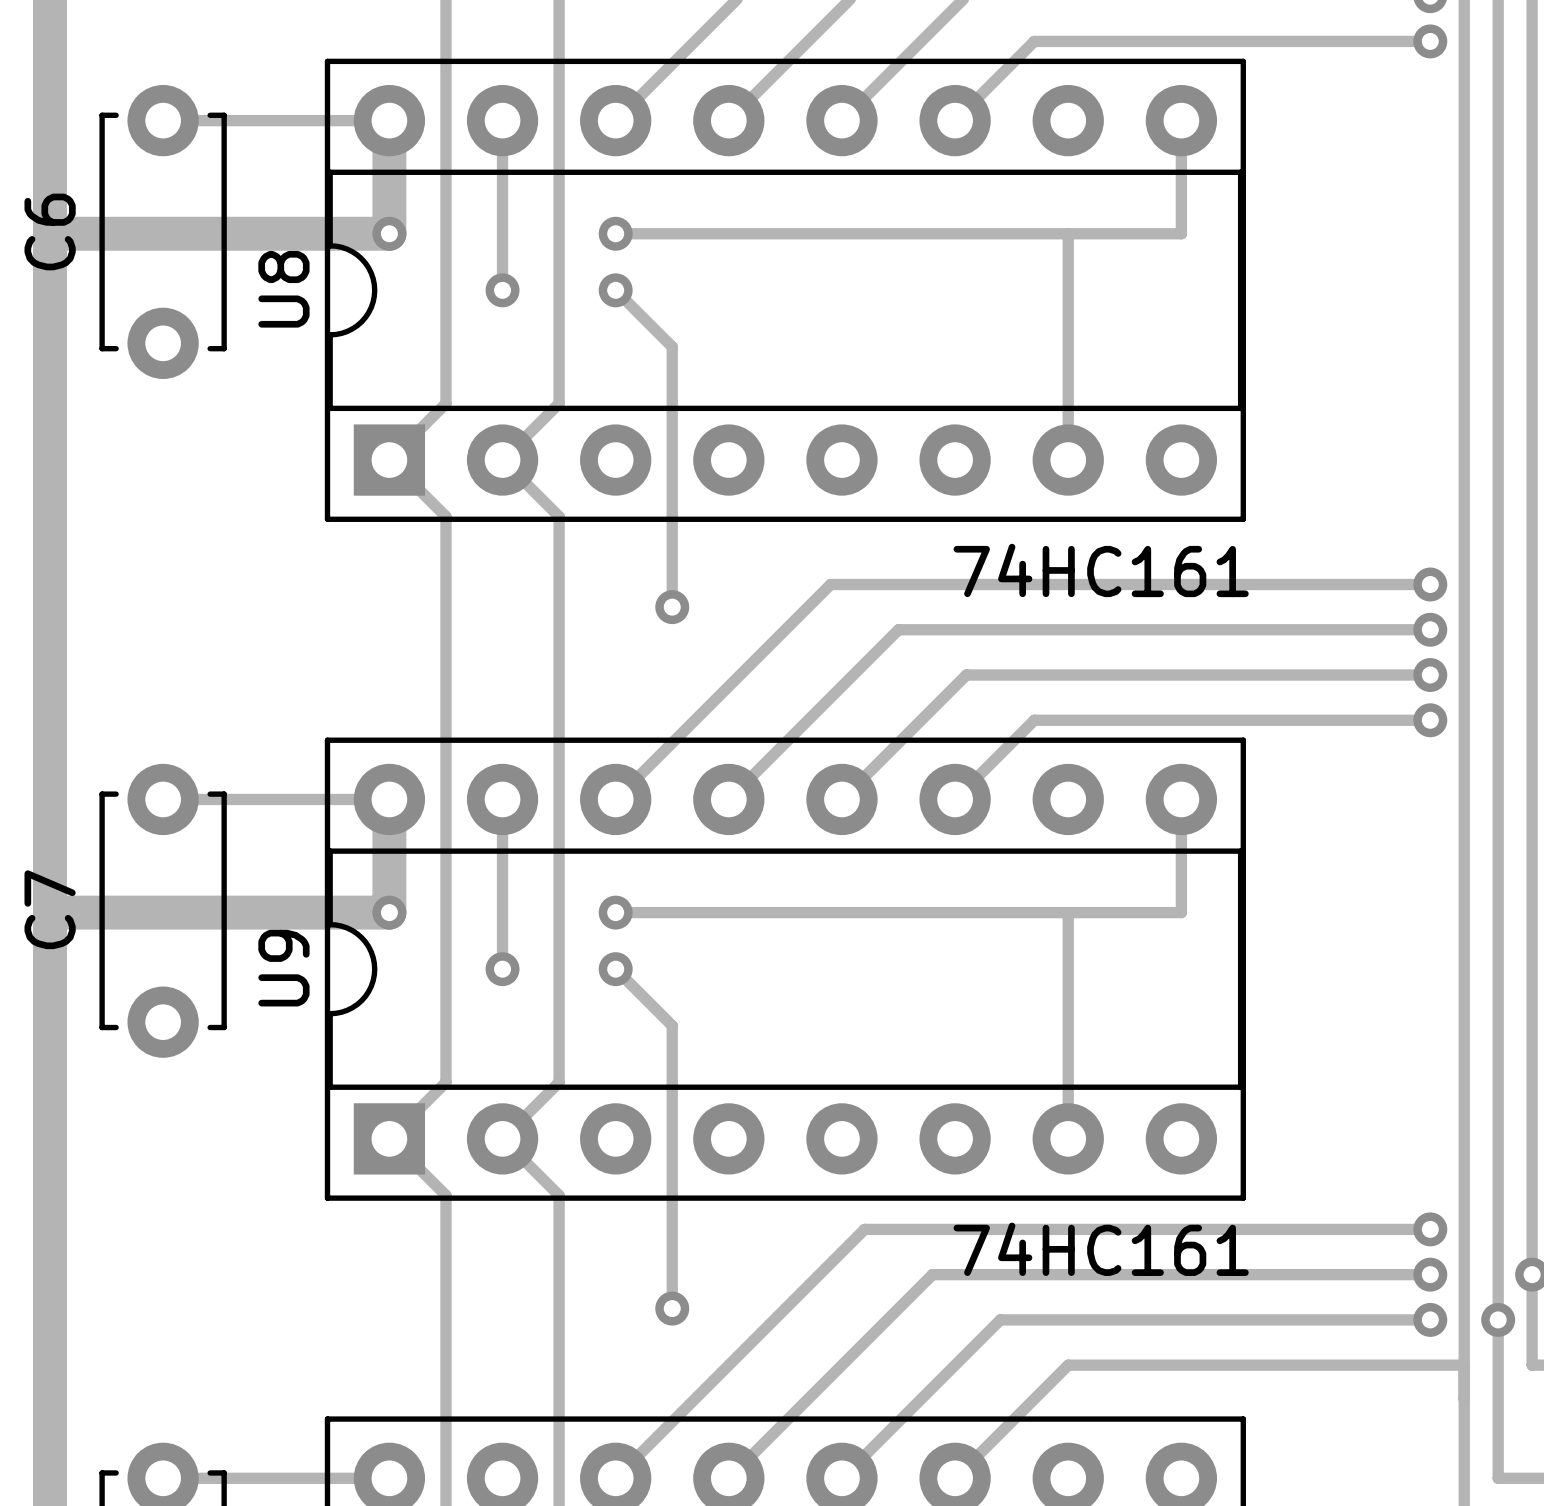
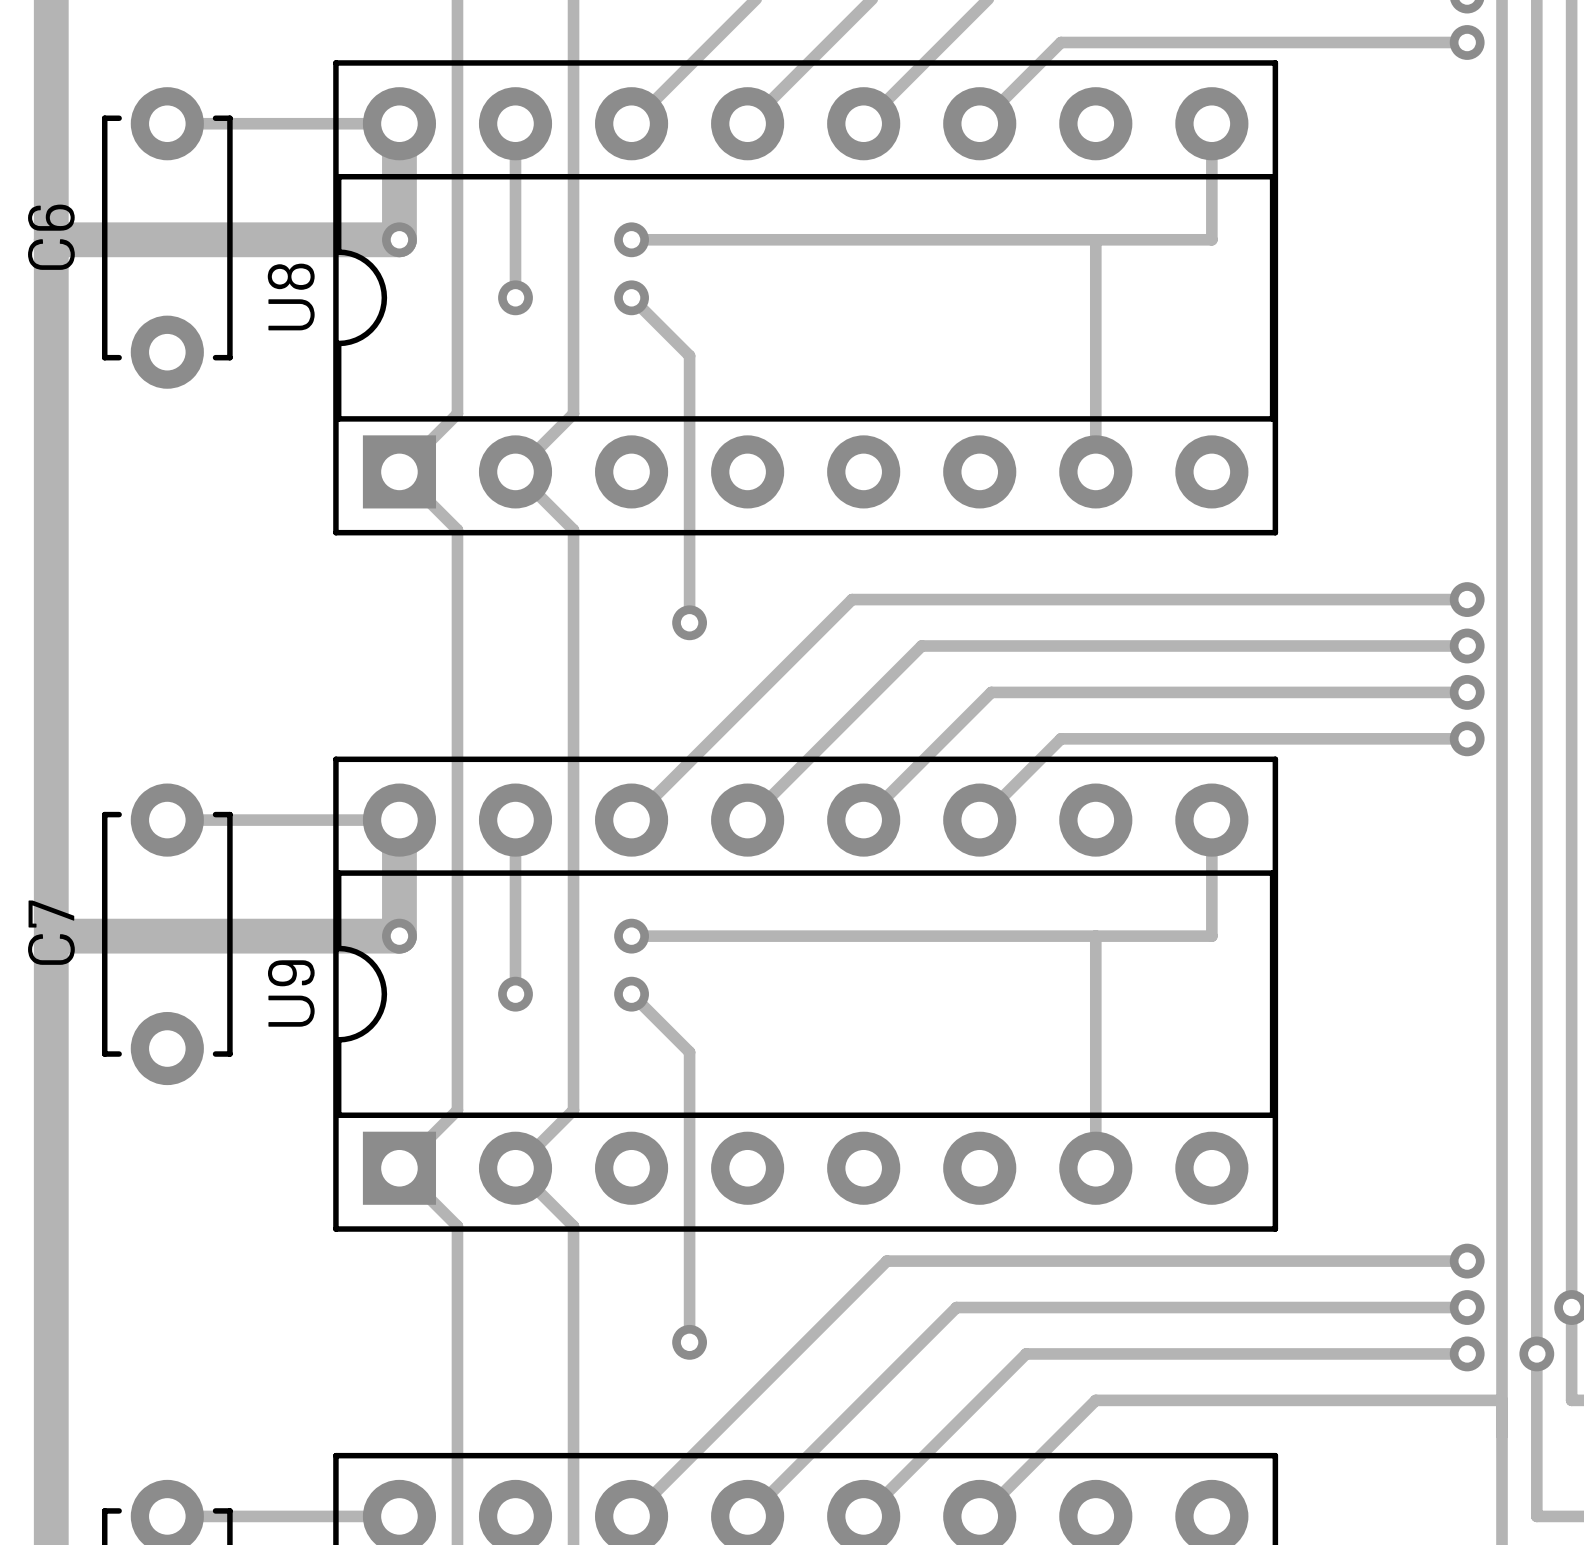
U8 value: 74HC161 (1101, 570) -> none
U9 value: 74HC161 (1101, 1249) -> none

